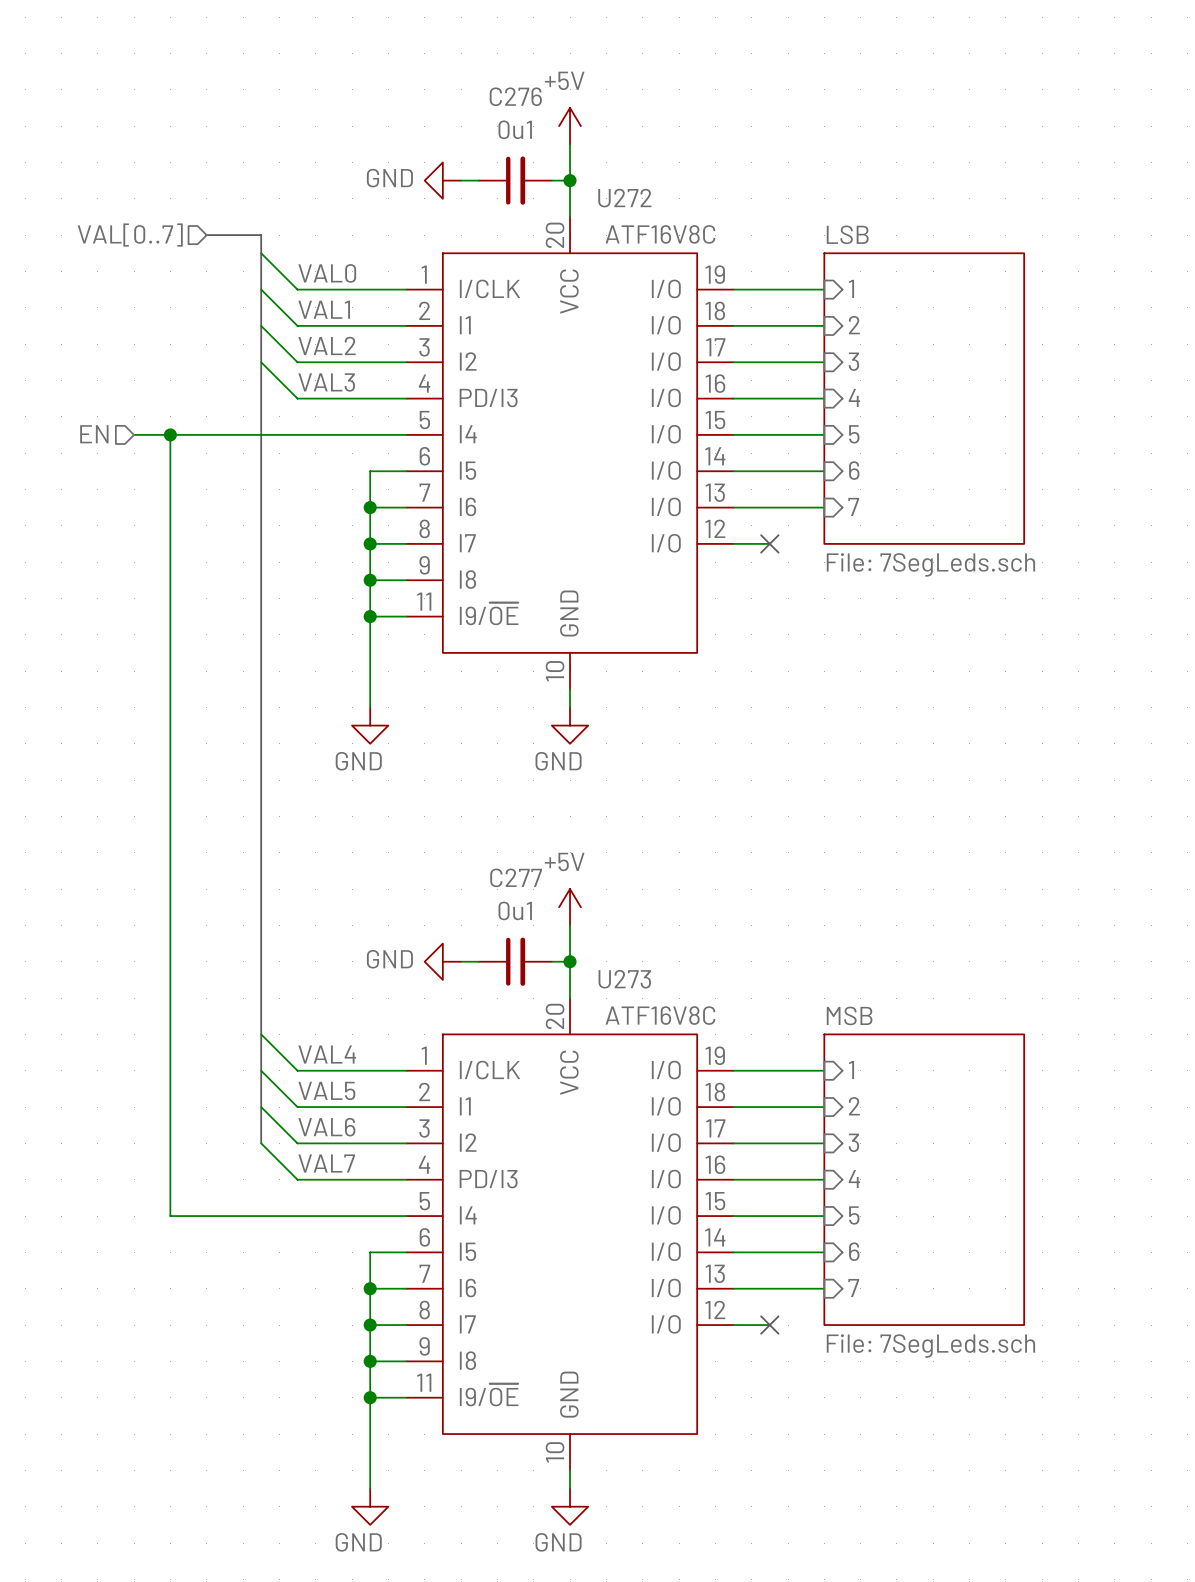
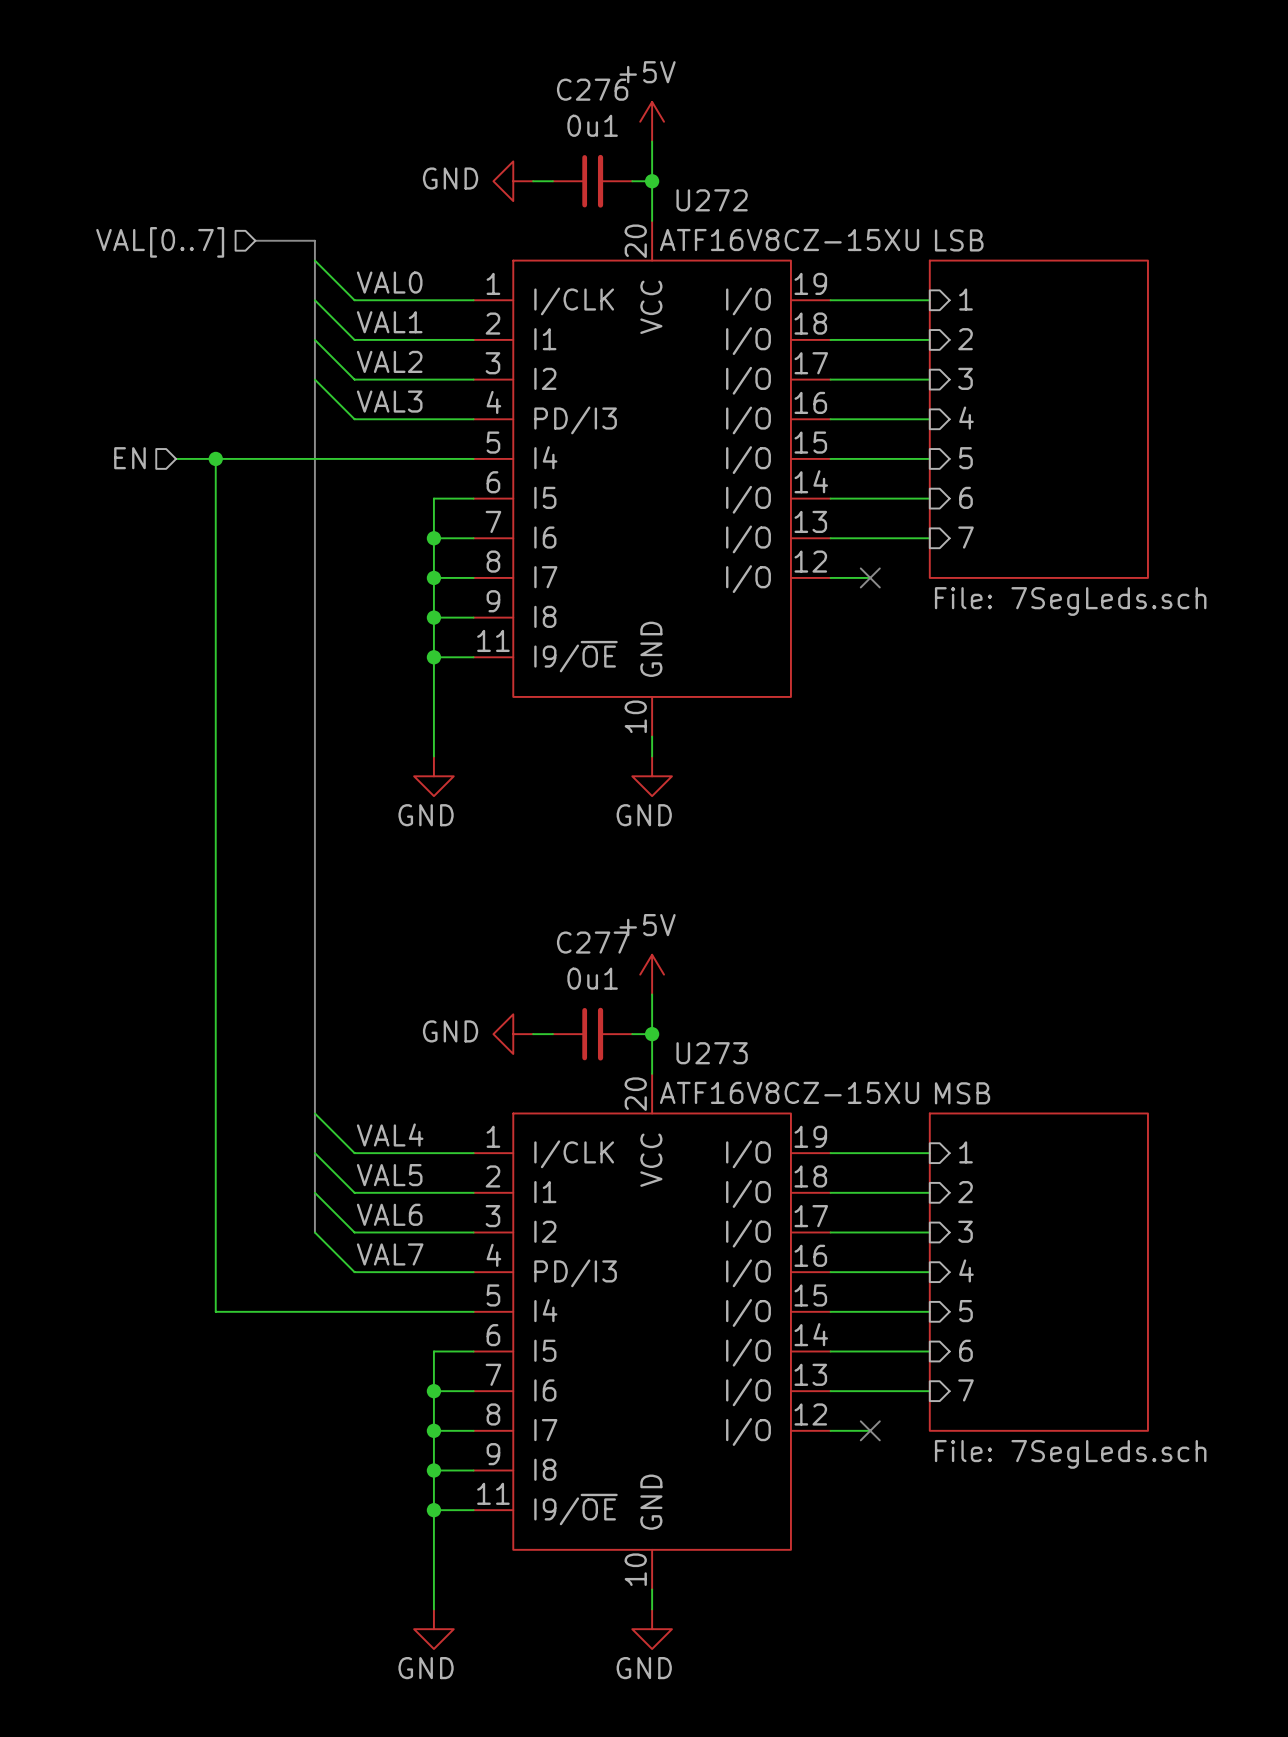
U272 value: ATF16V8C (660, 234) -> ATF16V8CZ-15XU (789, 240)
U273 value: ATF16V8C (660, 1015) -> ATF16V8CZ-15XU (789, 1092)

